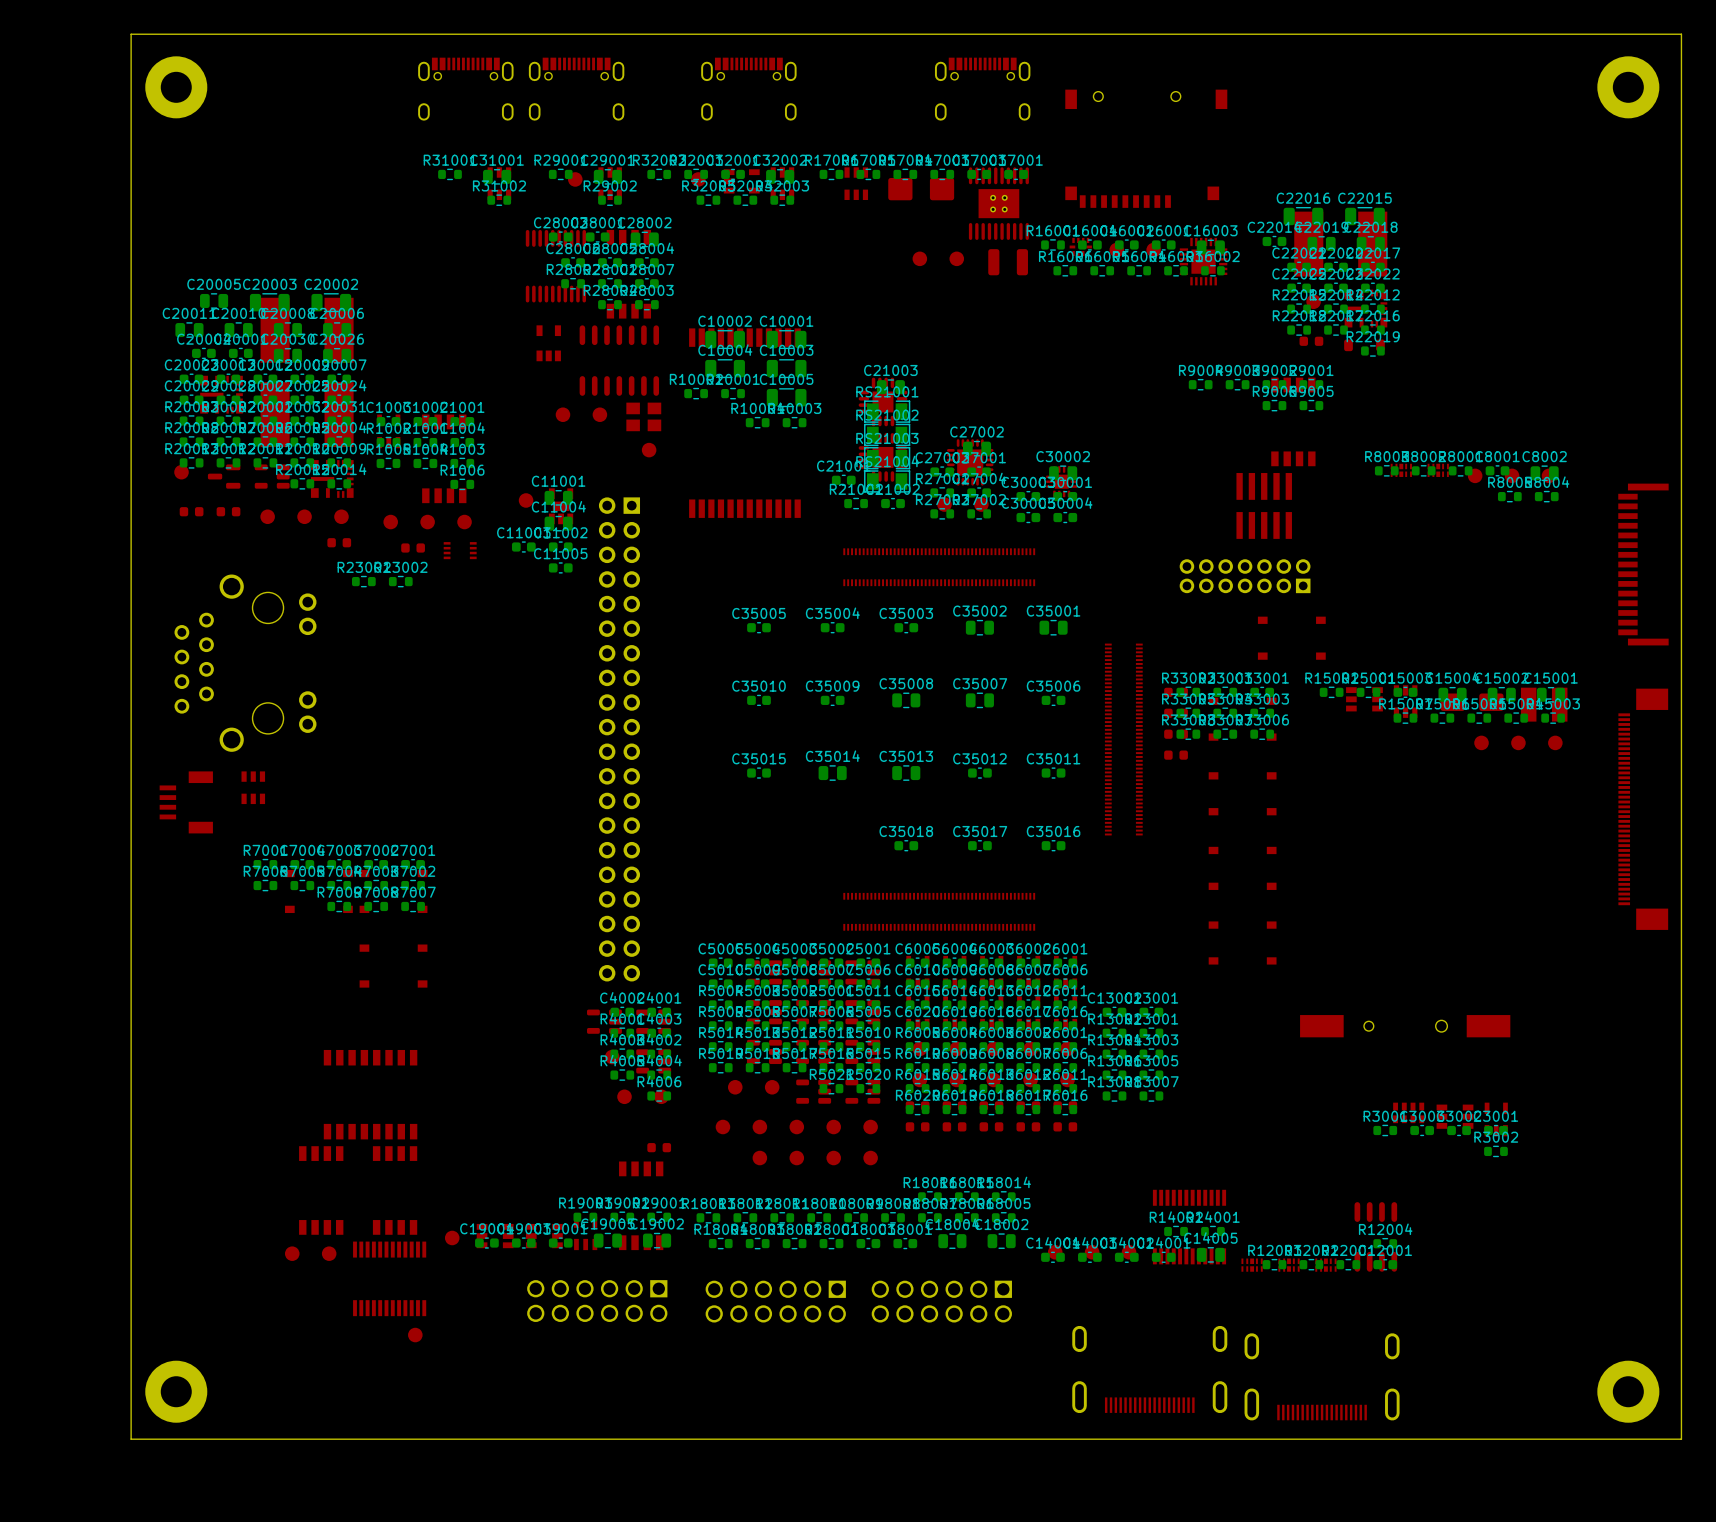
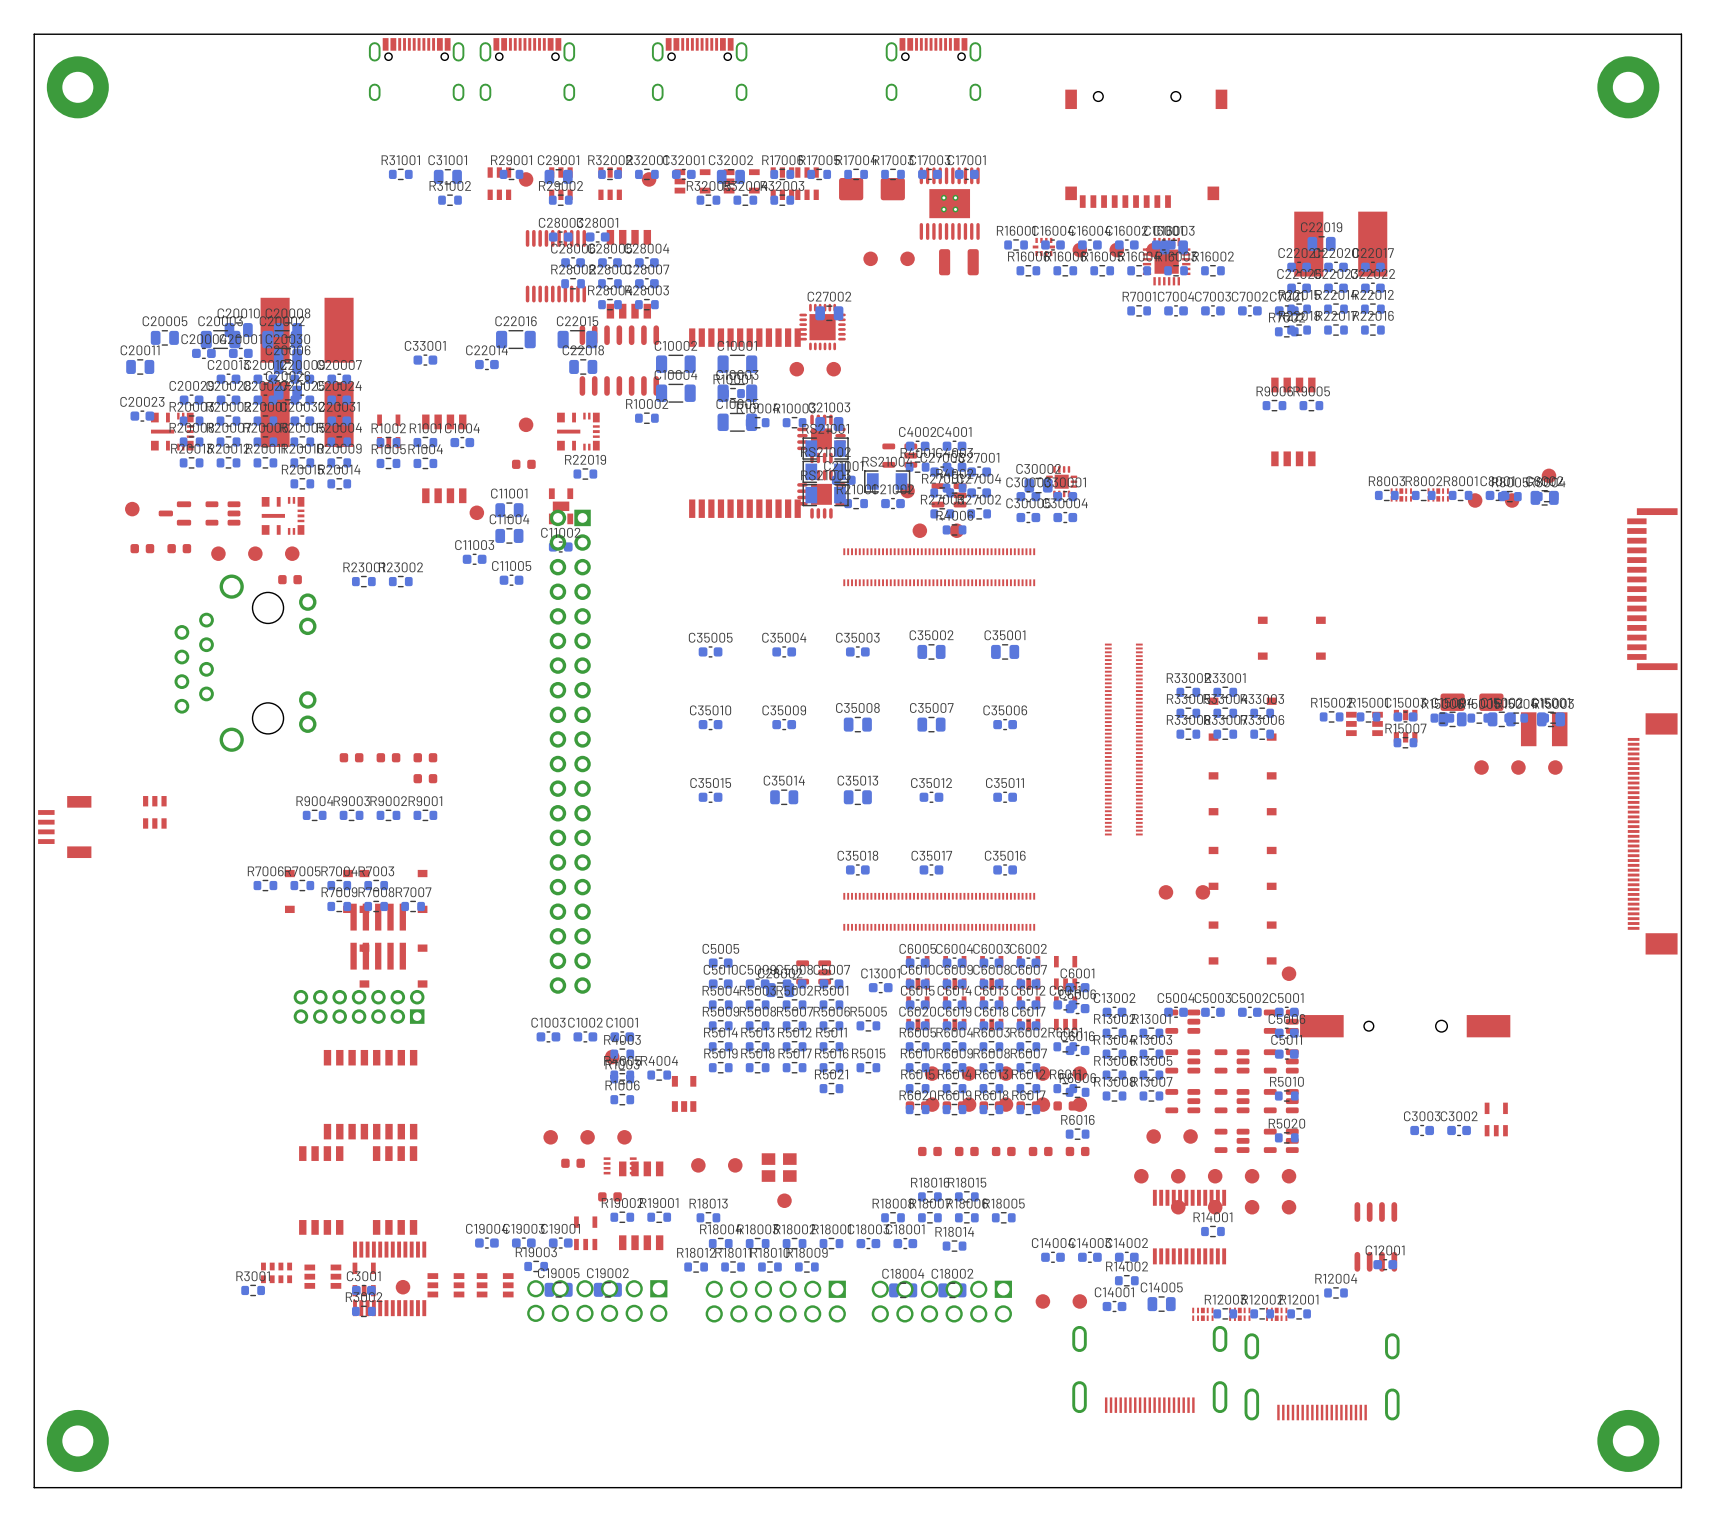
board edge: (131, 34) (131, 1439) (1681, 1439) -> (131, 34) (34, 34) (34, 1487) (1681, 1487) (1681, 1439)
part: none -> (416, 69)
part: none -> (527, 69)
part position: (176, 87) -> (77, 87)
part: (465, 89) -> none
part: (576, 89) -> none
part position: (748, 89) -> (699, 69)
part position: (982, 89) -> (933, 69)
part footprint: [691, 172, 706, 187] -> [674, 169, 711, 194]
R31001 position: (450, 174) -> (400, 174)
R29001 position: (560, 174) -> (511, 174)
R32002 position: (659, 174) -> (609, 174)
R32001 position: (696, 174) -> (646, 174)
C32001 position: (733, 174) -> (683, 174)
R17006 position: (831, 174) -> (782, 174)
R17005 position: (868, 174) -> (819, 174)
R17004 position: (905, 174) -> (856, 174)
R17003 position: (942, 174) -> (893, 174)
C17003 position: (979, 174) -> (929, 174)
C17001 position: (1016, 174) -> (966, 174)
C31001 position: (497, 176) -> (447, 176)
C29001 position: (607, 176) -> (558, 176)
C32002 position: (780, 176) -> (730, 176)
part: none -> (526, 179)
part: (575, 179) -> none
part: none -> (649, 179)
part: none -> (560, 183)
part position: (856, 183) -> (807, 183)
part position: (921, 189) -> (871, 189)
R31002 position: (499, 200) -> (450, 200)
R29002 position: (609, 200) -> (560, 200)
part position: (998, 203) -> (949, 203)
C22016 position: (1303, 216) -> (515, 339)
C22015 position: (1364, 216) -> (577, 339)
part footprint: [1069, 237, 1092, 257] -> [1072, 242, 1088, 258]
C28002 position: (644, 239) -> (780, 990)
C22014 position: (1274, 241) -> (486, 364)
C22018 position: (1370, 243) -> (583, 366)
R16001 position: (1052, 244) -> (1016, 244)
C16004: none -> (1052, 244)
part: none -> (1043, 247)
C16003 position: (1210, 247) -> (1173, 247)
part footprint: [949, 251, 965, 267] -> [939, 249, 979, 276]
part: none -> (870, 258)
part position: (919, 258) -> (907, 258)
part position: (1203, 261) -> (1166, 261)
part: (1008, 262) -> none
R16006: none -> (1028, 270)
C20005 position: (214, 300) -> (164, 337)
part: (1313, 301) -> none
C20003 position: (269, 302) -> (220, 339)
C20002 position: (331, 302) -> (282, 339)
part: (1365, 308) -> none
C20011 position: (189, 330) -> (140, 366)
C20006 position: (337, 330) -> (287, 366)
C10002 position: (725, 339) -> (675, 364)
C10001 position: (786, 339) -> (737, 364)
part: (1311, 341) -> none
part: (548, 343) -> none
part: (1364, 345) -> none
R22019 position: (1372, 350) -> (585, 474)
C20026 position: (337, 355) -> (287, 392)
C10004 position: (725, 368) -> (675, 393)
C10003 position: (786, 368) -> (737, 393)
part: none -> (796, 369)
part: none -> (833, 369)
C20023 position: (191, 379) -> (142, 416)
R9004 position: (1200, 384) -> (314, 815)
R9003 position: (1237, 384) -> (351, 815)
R9002 position: (1274, 384) -> (388, 815)
R9001 position: (1311, 384) -> (425, 815)
C21003 position: (890, 387) -> (829, 424)
R10002 position: (696, 393) -> (646, 418)
part position: (221, 394) -> (172, 431)
C10005 position: (786, 397) -> (737, 422)
part: (883, 401) -> none
RS21001 position: (887, 411) -> (825, 448)
part: (562, 414) -> none
part: (599, 414) -> none
part: (643, 416) -> none
C1003 position: (388, 421) -> (548, 1036)
C1002 position: (425, 421) -> (585, 1036)
C1001 position: (462, 421) -> (622, 1036)
part: none -> (526, 424)
part: none -> (578, 431)
RS21002 position: (887, 434) -> (825, 471)
part: none -> (821, 438)
C27002 position: (977, 448) -> (829, 313)
part: (649, 450) -> none
part: none -> (899, 455)
part: (883, 457) -> none
RS21003 position: (887, 458) -> (825, 495)
part position: (970, 462) -> (822, 327)
R1003 position: (462, 463) -> (622, 1078)
part: none -> (523, 464)
R8003 position: (1386, 470) -> (1386, 495)
part: (1401, 470) -> none
R8002 position: (1423, 470) -> (1423, 495)
part: (1438, 470) -> none
R8001 position: (1460, 470) -> (1460, 495)
C8001 position: (1497, 470) -> (1497, 495)
part: (181, 472) -> none
C30002 position: (1063, 473) -> (1038, 485)
C8002 position: (1544, 473) -> (1544, 497)
part: (1475, 475) -> none
part: (1512, 475) -> none
part position: (224, 476) -> (174, 513)
part: (272, 476) -> none
part position: (332, 478) -> (283, 515)
R1006 position: (462, 484) -> (622, 1099)
part: none -> (907, 490)
part: none -> (821, 494)
part: none -> (1401, 494)
part: none -> (1438, 494)
part: none -> (949, 495)
C11001 position: (558, 497) -> (509, 510)
part: (526, 500) -> none
part: none -> (1475, 500)
part: none -> (1512, 500)
part: (944, 504) -> none
part: (981, 504) -> none
part: (1264, 505) -> none
part footprint: [216, 507, 241, 517] -> [205, 501, 241, 526]
part: none -> (132, 509)
part: (191, 511) -> none
part: (267, 516) -> none
part: (304, 516) -> none
part: (341, 516) -> none
part: (390, 522) -> none
part: (427, 522) -> none
part position: (464, 522) -> (476, 512)
C11004 position: (558, 523) -> (509, 535)
part: none -> (919, 530)
part: none -> (956, 530)
part: (339, 542) -> none
C11003 position: (523, 546) -> (474, 559)
part: none -> (142, 548)
part: none -> (179, 548)
part: (413, 548) -> none
part: (460, 550) -> none
part: none -> (218, 553)
part: none -> (255, 553)
part: none -> (292, 553)
part position: (1643, 564) -> (1652, 589)
C11005 position: (560, 567) -> (511, 580)
part: (1245, 576) -> none
part: none -> (290, 579)
C35005 position: (759, 627) -> (710, 651)
C35004 position: (832, 627) -> (784, 651)
C35003 position: (906, 627) -> (857, 651)
C35002 position: (979, 627) -> (931, 651)
C35001 position: (1053, 627) -> (1005, 651)
part: (1176, 692) -> none
C33001 position: (1262, 692) -> (425, 360)
R15002 position: (1331, 692) -> (1331, 716)
R15001 position: (1368, 692) -> (1368, 716)
C15003 position: (1405, 692) -> (1405, 716)
C15004 position: (1452, 694) -> (1452, 719)
C15002 position: (1501, 694) -> (1501, 719)
C15001 position: (1550, 694) -> (1550, 719)
part position: (1364, 699) -> (1364, 723)
C35010 position: (759, 700) -> (710, 724)
C35009 position: (832, 700) -> (784, 724)
C35008 position: (906, 700) -> (857, 724)
C35007 position: (979, 700) -> (931, 724)
C35006 position: (1053, 700) -> (1005, 724)
part position: (1405, 701) -> (1405, 726)
part position: (1544, 704) -> (1544, 729)
part: (1176, 713) -> none
R15007 position: (1405, 718) -> (1405, 742)
part: (1176, 734) -> none
part position: (619, 739) -> (570, 751)
part: (1481, 742) -> none
part: (1518, 742) -> none
part: (1555, 742) -> none
part: (1176, 755) -> none
part: none -> (351, 757)
part: none -> (388, 757)
part: none -> (425, 757)
part: none -> (1481, 767)
part: none -> (1518, 767)
part: none -> (1555, 767)
C35015 position: (759, 773) -> (710, 797)
C35014 position: (832, 773) -> (784, 797)
C35013 position: (906, 773) -> (857, 797)
C35012 position: (979, 773) -> (931, 797)
C35011 position: (1053, 773) -> (1005, 797)
part: none -> (425, 778)
part position: (253, 787) -> (154, 812)
part position: (186, 802) -> (64, 827)
part position: (1643, 809) -> (1652, 833)
C35018 position: (906, 845) -> (857, 869)
C35017 position: (979, 845) -> (931, 869)
C35016 position: (1053, 845) -> (1005, 869)
R7001 position: (265, 864) -> (1139, 310)
C7004 position: (302, 864) -> (1176, 310)
C7003 position: (339, 864) -> (1212, 310)
C7002 position: (376, 864) -> (1249, 310)
C7001 position: (413, 864) -> (1286, 310)
R7002 position: (413, 885) -> (1286, 331)
part: none -> (1165, 892)
part: none -> (1202, 892)
part: none -> (378, 936)
C5004 position: (757, 963) -> (1176, 1012)
C5003 position: (794, 963) -> (1212, 1012)
C5002 position: (831, 963) -> (1249, 1012)
C5001 position: (868, 963) -> (1286, 1012)
C6001 position: (1065, 963) -> (1077, 987)
part: (764, 972) -> none
part: (862, 972) -> none
part: none -> (1289, 973)
C5006 position: (868, 983) -> (1286, 1033)
C6006 position: (1065, 983) -> (1077, 1008)
C5011 position: (868, 1004) -> (1286, 1054)
part: none -> (359, 1006)
C4002 position: (622, 1012) -> (917, 446)
C4001 position: (659, 1012) -> (954, 446)
part: (764, 1012) -> none
part: (813, 1012) -> none
part: (862, 1012) -> none
C13001 position: (1151, 1012) -> (880, 987)
part: (604, 1021) -> none
part: (653, 1021) -> none
part: none -> (1182, 1021)
part: none -> (1281, 1021)
C6016 position: (1065, 1025) -> (1077, 1050)
R4001 position: (622, 1033) -> (917, 467)
C4003 position: (659, 1033) -> (954, 467)
R5010 position: (868, 1046) -> (1286, 1096)
part: (919, 1048) -> none
part: (956, 1048) -> none
part: (993, 1048) -> none
part: (1030, 1048) -> none
part: (1067, 1048) -> none
part: (764, 1051) -> none
part: (813, 1051) -> none
part: (862, 1051) -> none
R4002 position: (659, 1054) -> (954, 488)
part: (653, 1061) -> none
part: none -> (1182, 1061)
part: none -> (1232, 1061)
part: none -> (1281, 1061)
R6006 position: (1065, 1067) -> (1077, 1092)
part: none -> (932, 1073)
part: none -> (969, 1073)
part: none -> (1005, 1073)
part: none -> (1042, 1073)
part: none -> (1079, 1073)
part: (919, 1079) -> none
part: (956, 1079) -> none
part: (993, 1079) -> none
part: (1030, 1079) -> none
part: (1067, 1079) -> none
part: (735, 1087) -> none
part: (772, 1087) -> none
R5020 position: (868, 1088) -> (1286, 1137)
part: (813, 1091) -> none
part: (862, 1091) -> none
part: none -> (684, 1093)
part: (624, 1096) -> none
R4006 position: (659, 1096) -> (954, 529)
part: (661, 1096) -> none
part: none -> (1182, 1101)
part: none -> (1232, 1101)
part: none -> (1281, 1101)
part: none -> (932, 1104)
part: none -> (969, 1104)
part: none -> (1005, 1104)
part: none -> (1042, 1104)
part: none -> (1079, 1104)
R6016 position: (1065, 1109) -> (1077, 1134)
part: (1408, 1112) -> none
part: (1454, 1116) -> none
part: (917, 1126) -> none
part: (954, 1126) -> none
part: (991, 1126) -> none
part: (1028, 1126) -> none
part: (1065, 1126) -> none
part: (722, 1127) -> none
part: (759, 1127) -> none
part: (796, 1127) -> none
part: (833, 1127) -> none
part: (870, 1127) -> none
R3001 position: (1385, 1130) -> (253, 1290)
C3001 position: (1495, 1130) -> (363, 1290)
part: none -> (1153, 1136)
part: none -> (1190, 1136)
part: none -> (550, 1137)
part: none -> (587, 1137)
part: none -> (624, 1137)
part: none -> (1232, 1140)
part: none -> (1281, 1140)
part: (659, 1147) -> none
part: none -> (929, 1151)
part: none -> (966, 1151)
part: none -> (1003, 1151)
part: none -> (1040, 1151)
part: none -> (1077, 1151)
R3002 position: (1495, 1151) -> (363, 1311)
part: (759, 1158) -> none
part: (796, 1158) -> none
part: (833, 1158) -> none
part: (870, 1158) -> none
part: none -> (573, 1163)
part: none -> (620, 1165)
part: none -> (698, 1165)
part: none -> (735, 1165)
part: none -> (779, 1167)
part: none -> (1141, 1176)
part: none -> (1178, 1176)
part: none -> (1215, 1176)
part: none -> (1252, 1176)
part: none -> (1289, 1176)
part: none -> (609, 1196)
R18014 position: (1003, 1196) -> (954, 1246)
part: none -> (784, 1200)
part: none -> (1178, 1207)
part: none -> (1215, 1207)
part: none -> (1252, 1207)
part: none -> (1289, 1207)
R19003 position: (585, 1217) -> (536, 1266)
R18012 position: (745, 1217) -> (696, 1267)
R18011 position: (782, 1217) -> (733, 1267)
R18010 position: (819, 1217) -> (769, 1267)
R18009 position: (856, 1217) -> (806, 1267)
R14002 position: (1176, 1231) -> (1126, 1280)
part: (495, 1236) -> none
part: (544, 1236) -> none
part: (452, 1237) -> none
C19005 position: (607, 1240) -> (558, 1289)
C19002 position: (657, 1240) -> (607, 1289)
C18004 position: (952, 1241) -> (903, 1290)
C18002 position: (1001, 1241) -> (952, 1290)
R12004 position: (1385, 1243) -> (1336, 1292)
part: (1055, 1252) -> none
part: (1092, 1252) -> none
part: (1129, 1252) -> none
part: (292, 1253) -> none
part: (329, 1253) -> none
C14005 position: (1210, 1254) -> (1161, 1304)
C14001 position: (1163, 1257) -> (1114, 1306)
R12003 position: (1274, 1264) -> (1225, 1313)
R12002 position: (1311, 1264) -> (1262, 1313)
R12001 position: (1348, 1264) -> (1299, 1313)
part: (1252, 1265) -> none
part: (1289, 1265) -> none
part: (1325, 1265) -> none
part: none -> (276, 1272)
part: none -> (322, 1276)
part: none -> (364, 1279)
part: none -> (445, 1285)
part: none -> (495, 1285)
part: none -> (403, 1287)
part: none -> (1042, 1301)
part: none -> (1079, 1301)
part: none -> (1202, 1314)
part: none -> (1239, 1314)
part: none -> (1276, 1314)
part: (415, 1335) -> none
part position: (176, 1391) -> (77, 1440)
part position: (1628, 1391) -> (1628, 1440)

